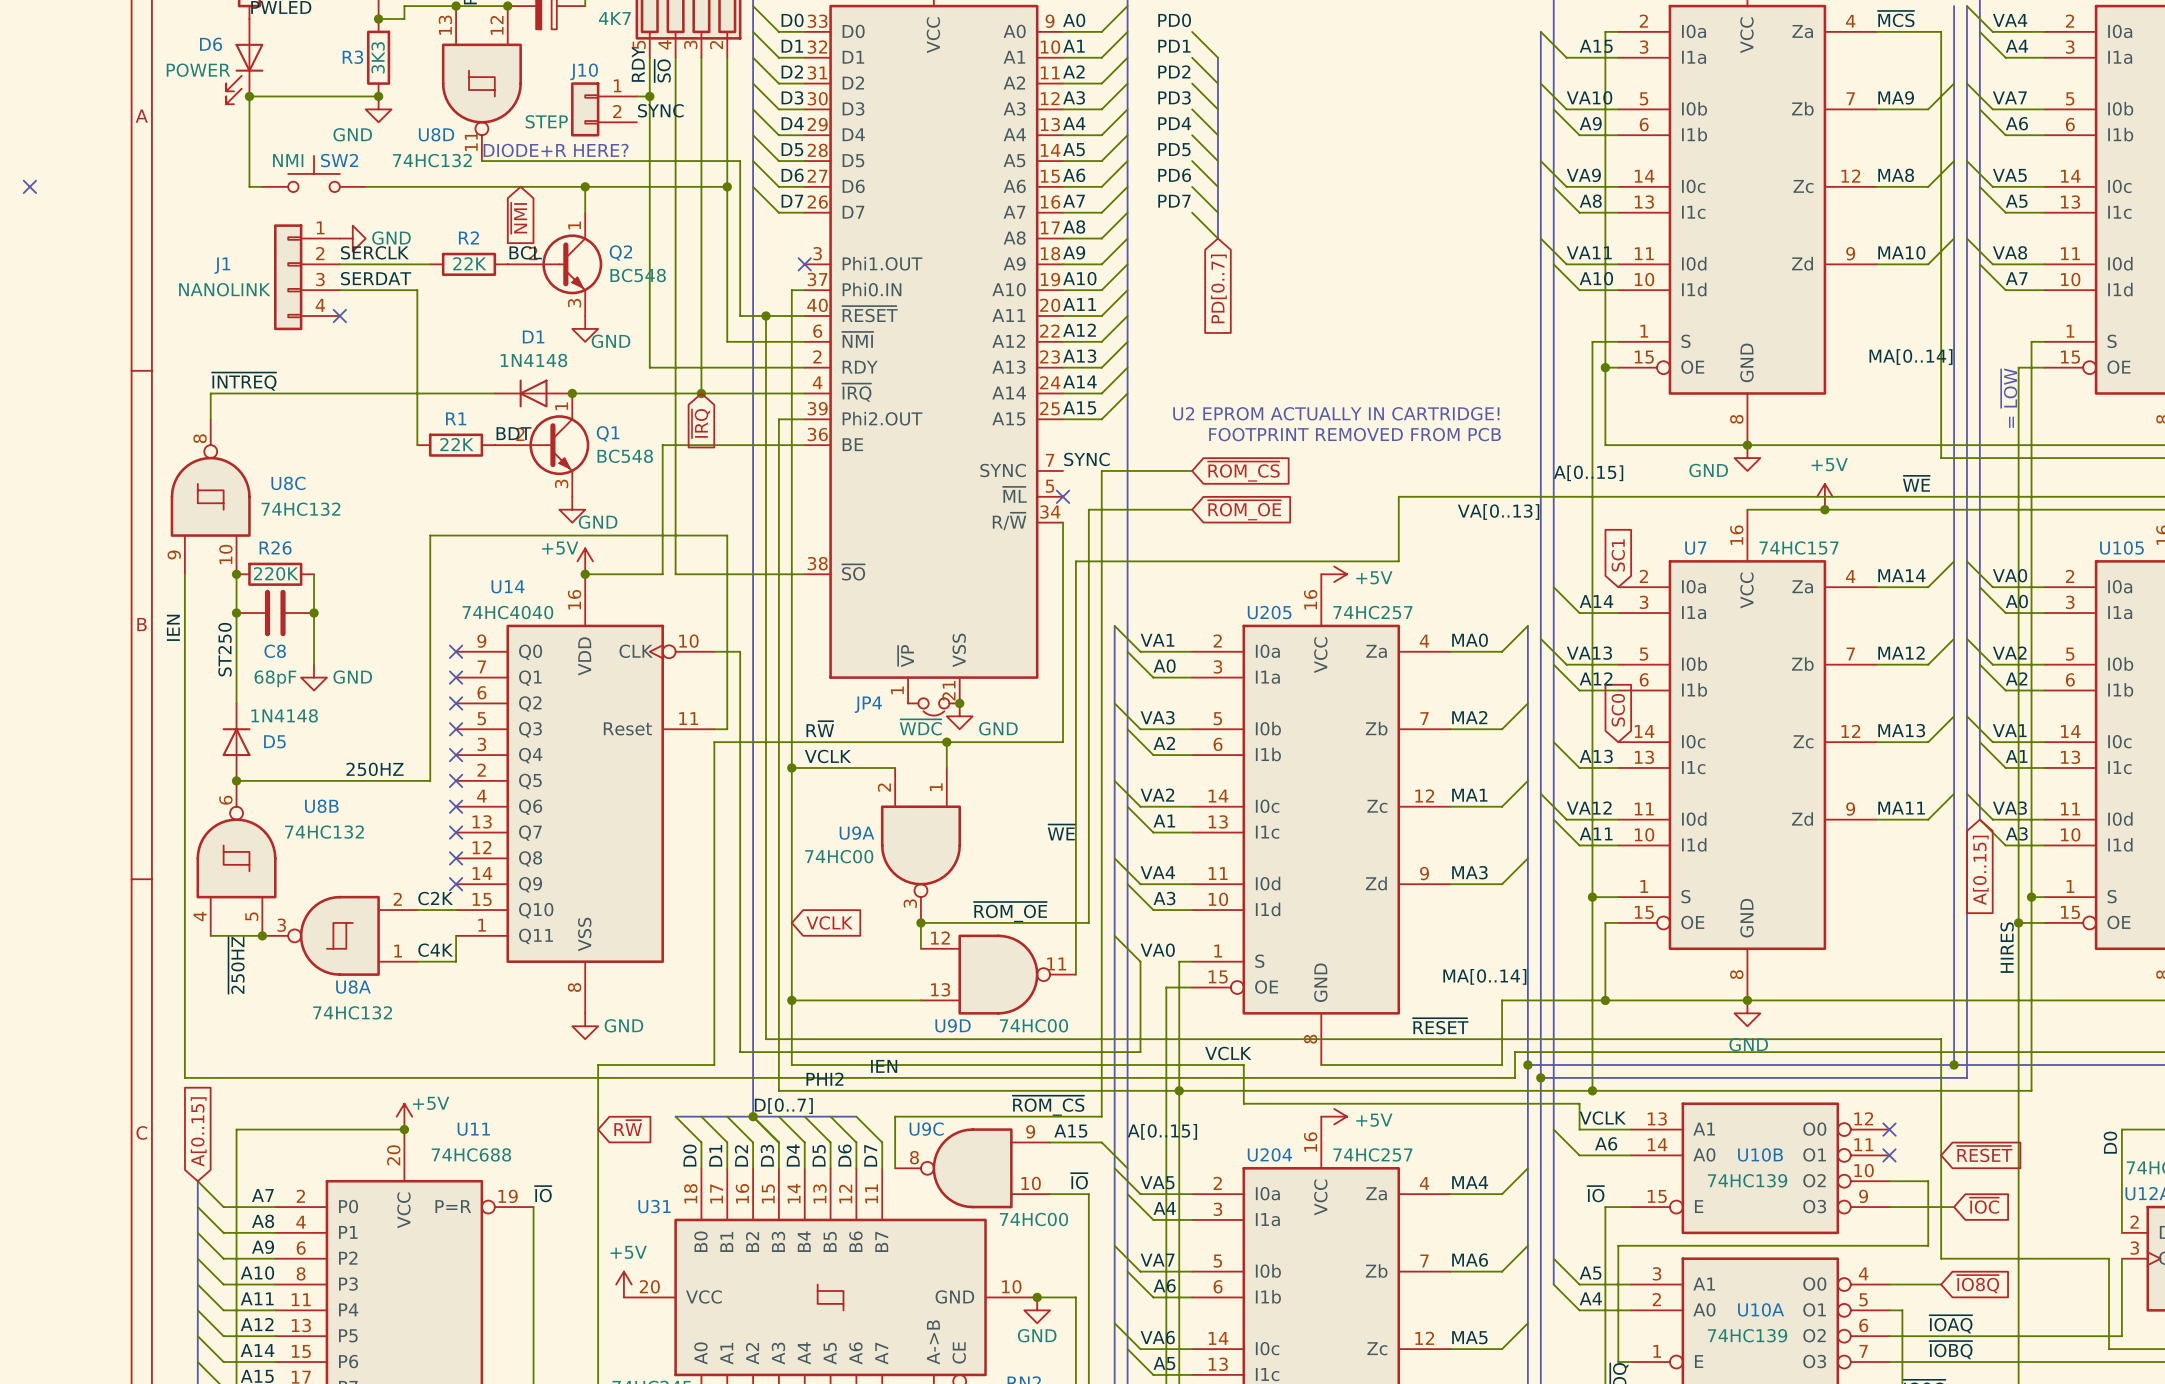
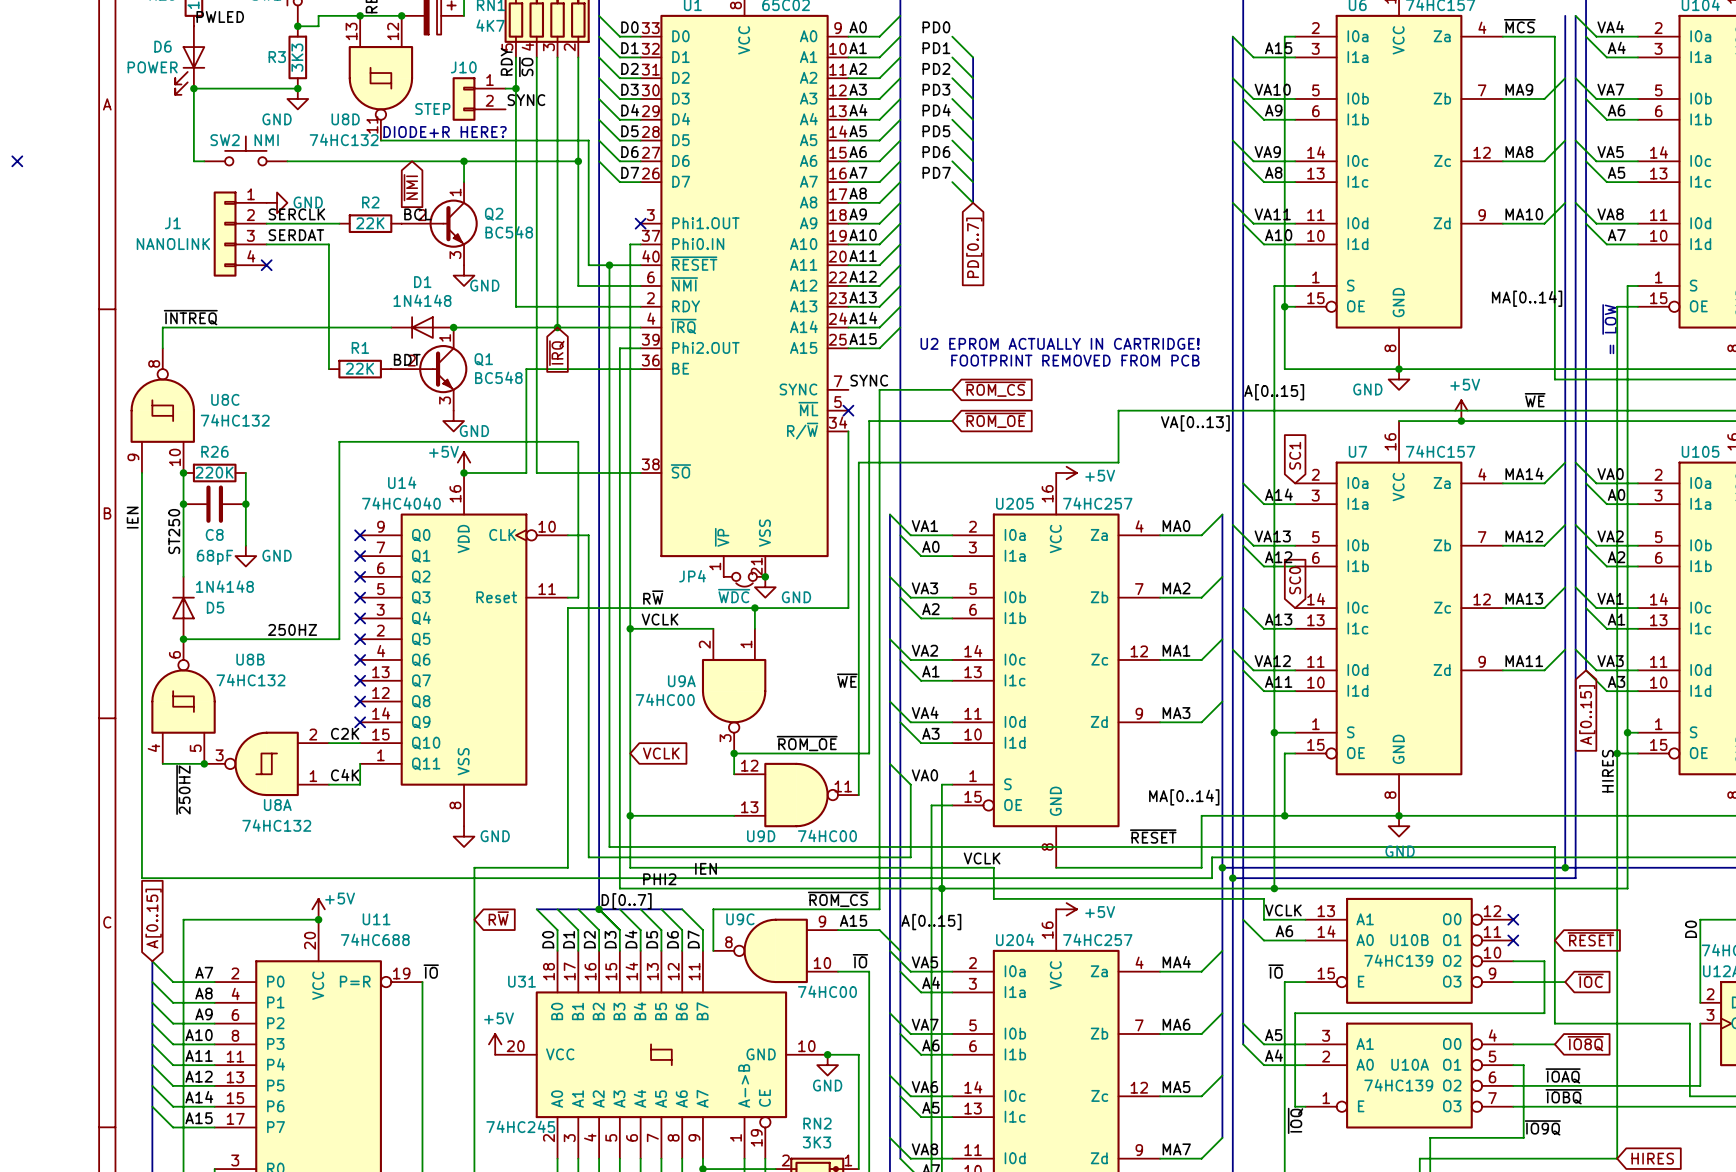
SW2 value position: NMI (288, 160) -> NMI (266, 140)
SW2 name position: SW2 (339, 160) -> SW2 (225, 140)

